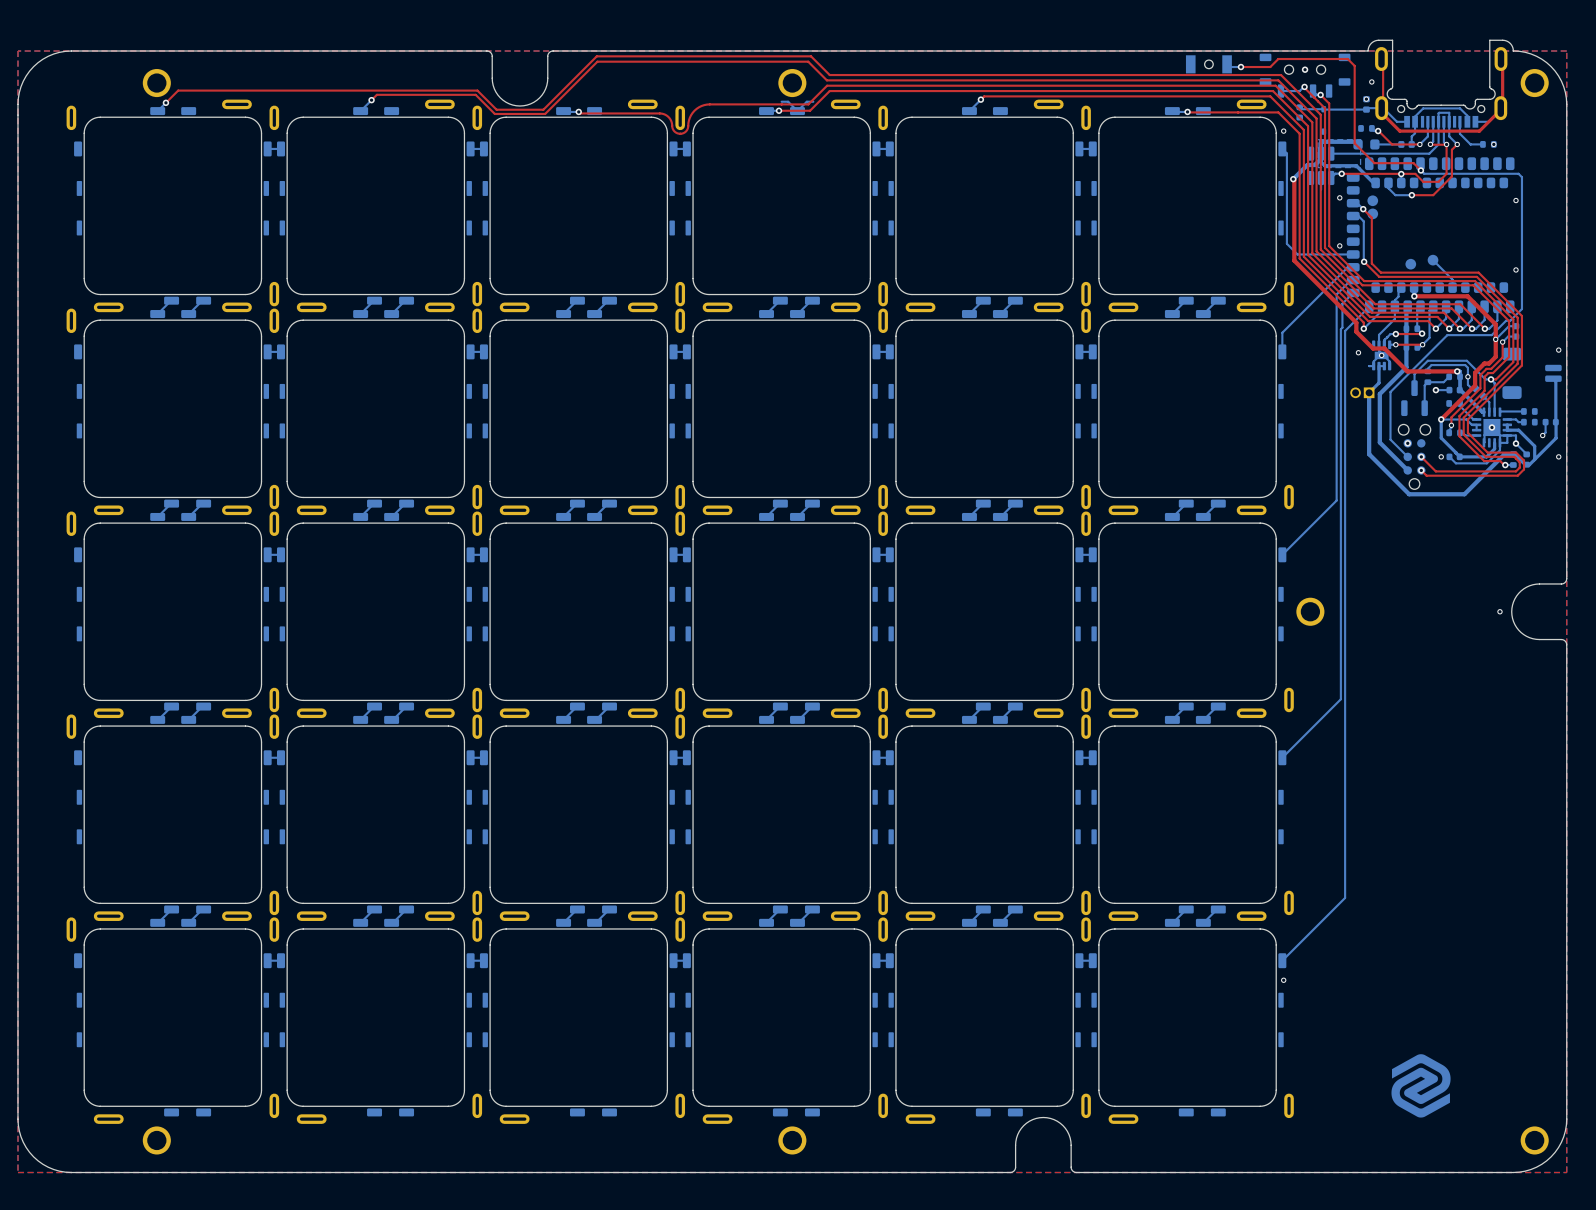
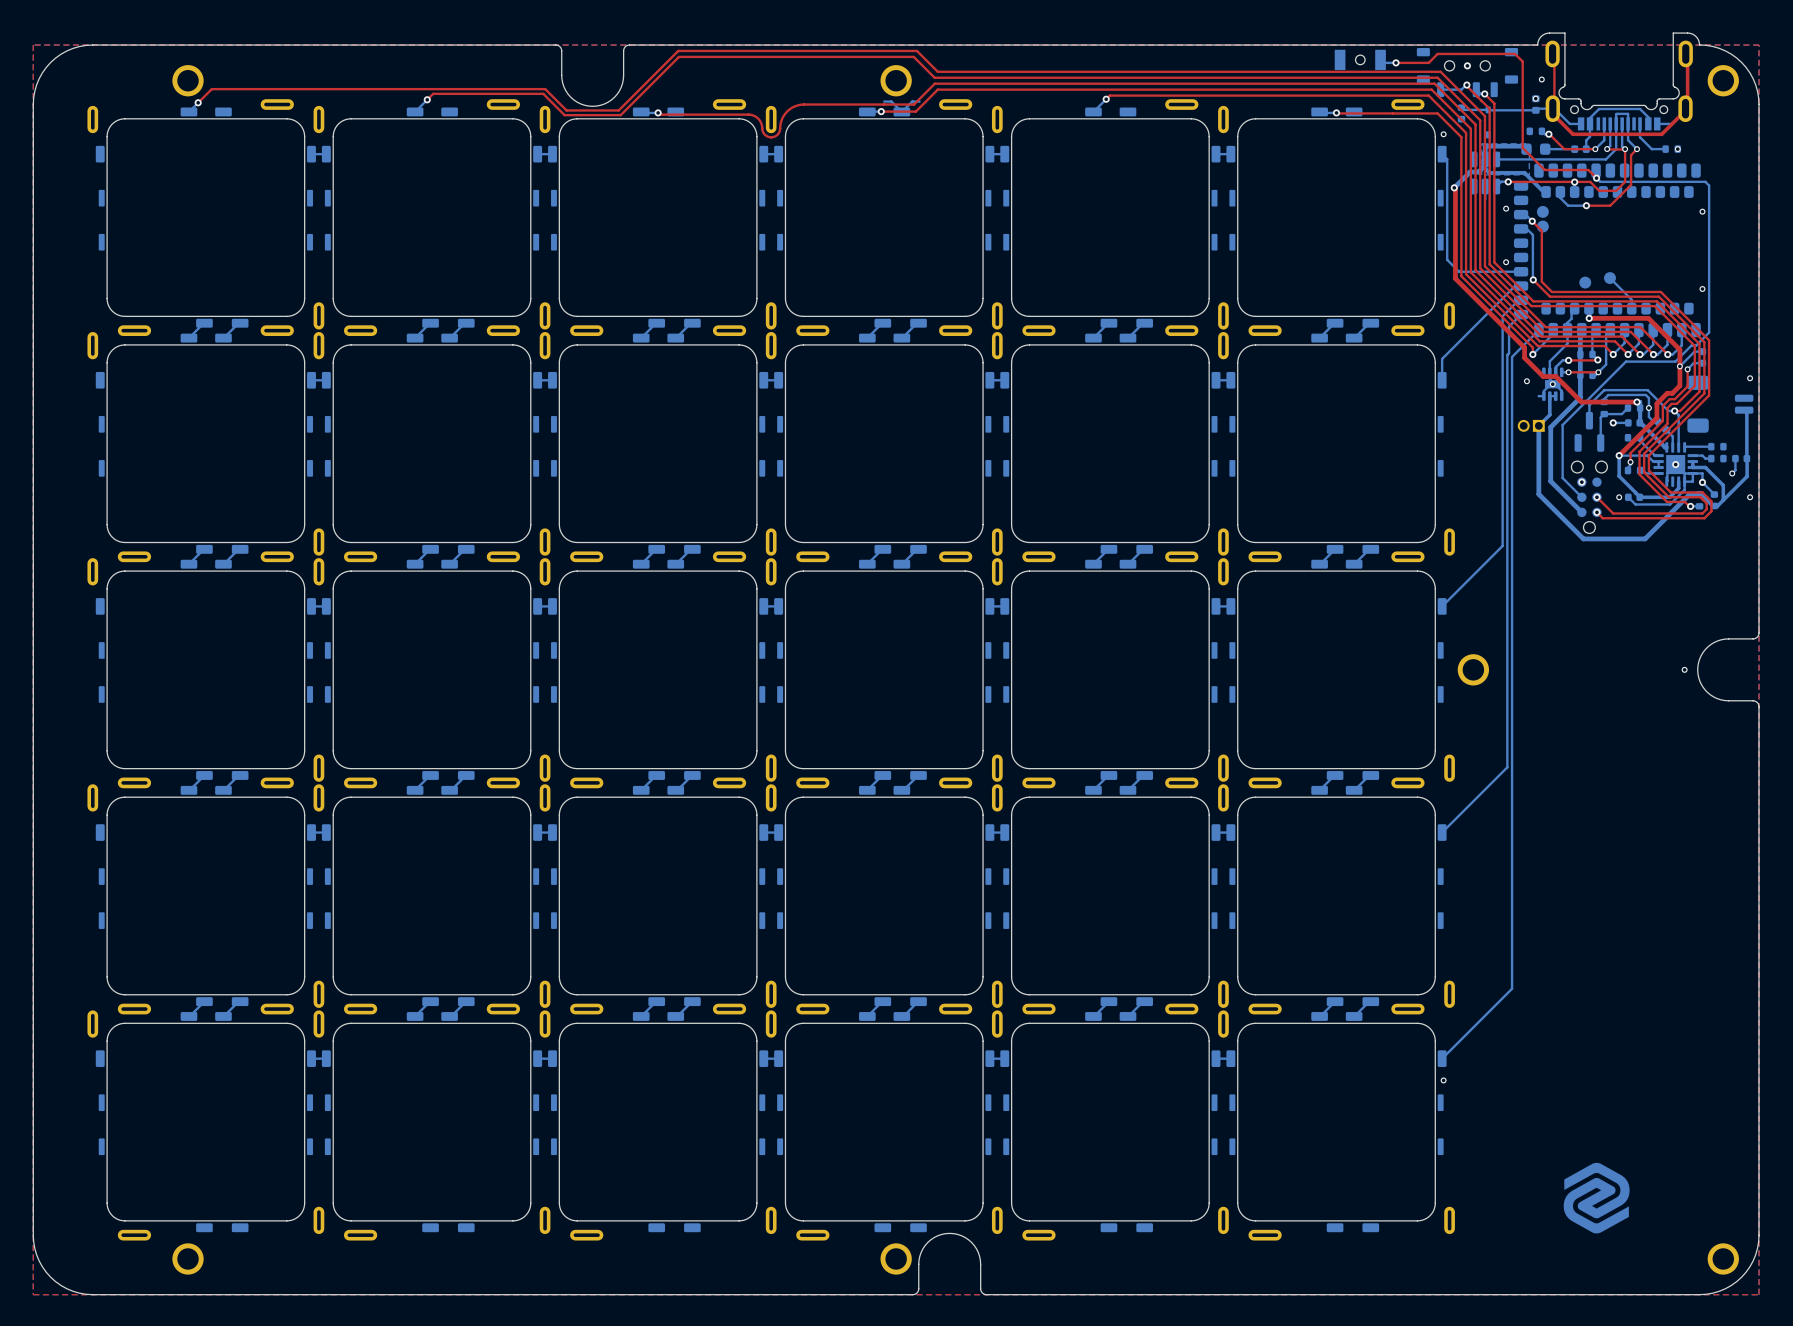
board edge: (807, 1172) (873, 1172) -> (912, 1294) (918, 1290) (919, 1260) (922, 1248) (934, 1237) (949, 1233) (965, 1237) (976, 1248) (980, 1260) (980, 1290) (986, 1294)
board edge: (1010, 1172) (1015, 1168) (1015, 1141) (1019, 1131) (1029, 1121) (1043, 1117) (1057, 1121) (1067, 1131) (1070, 1141) (1071, 1168) (1076, 1172) -> (1138, 1294) (1212, 1294)

